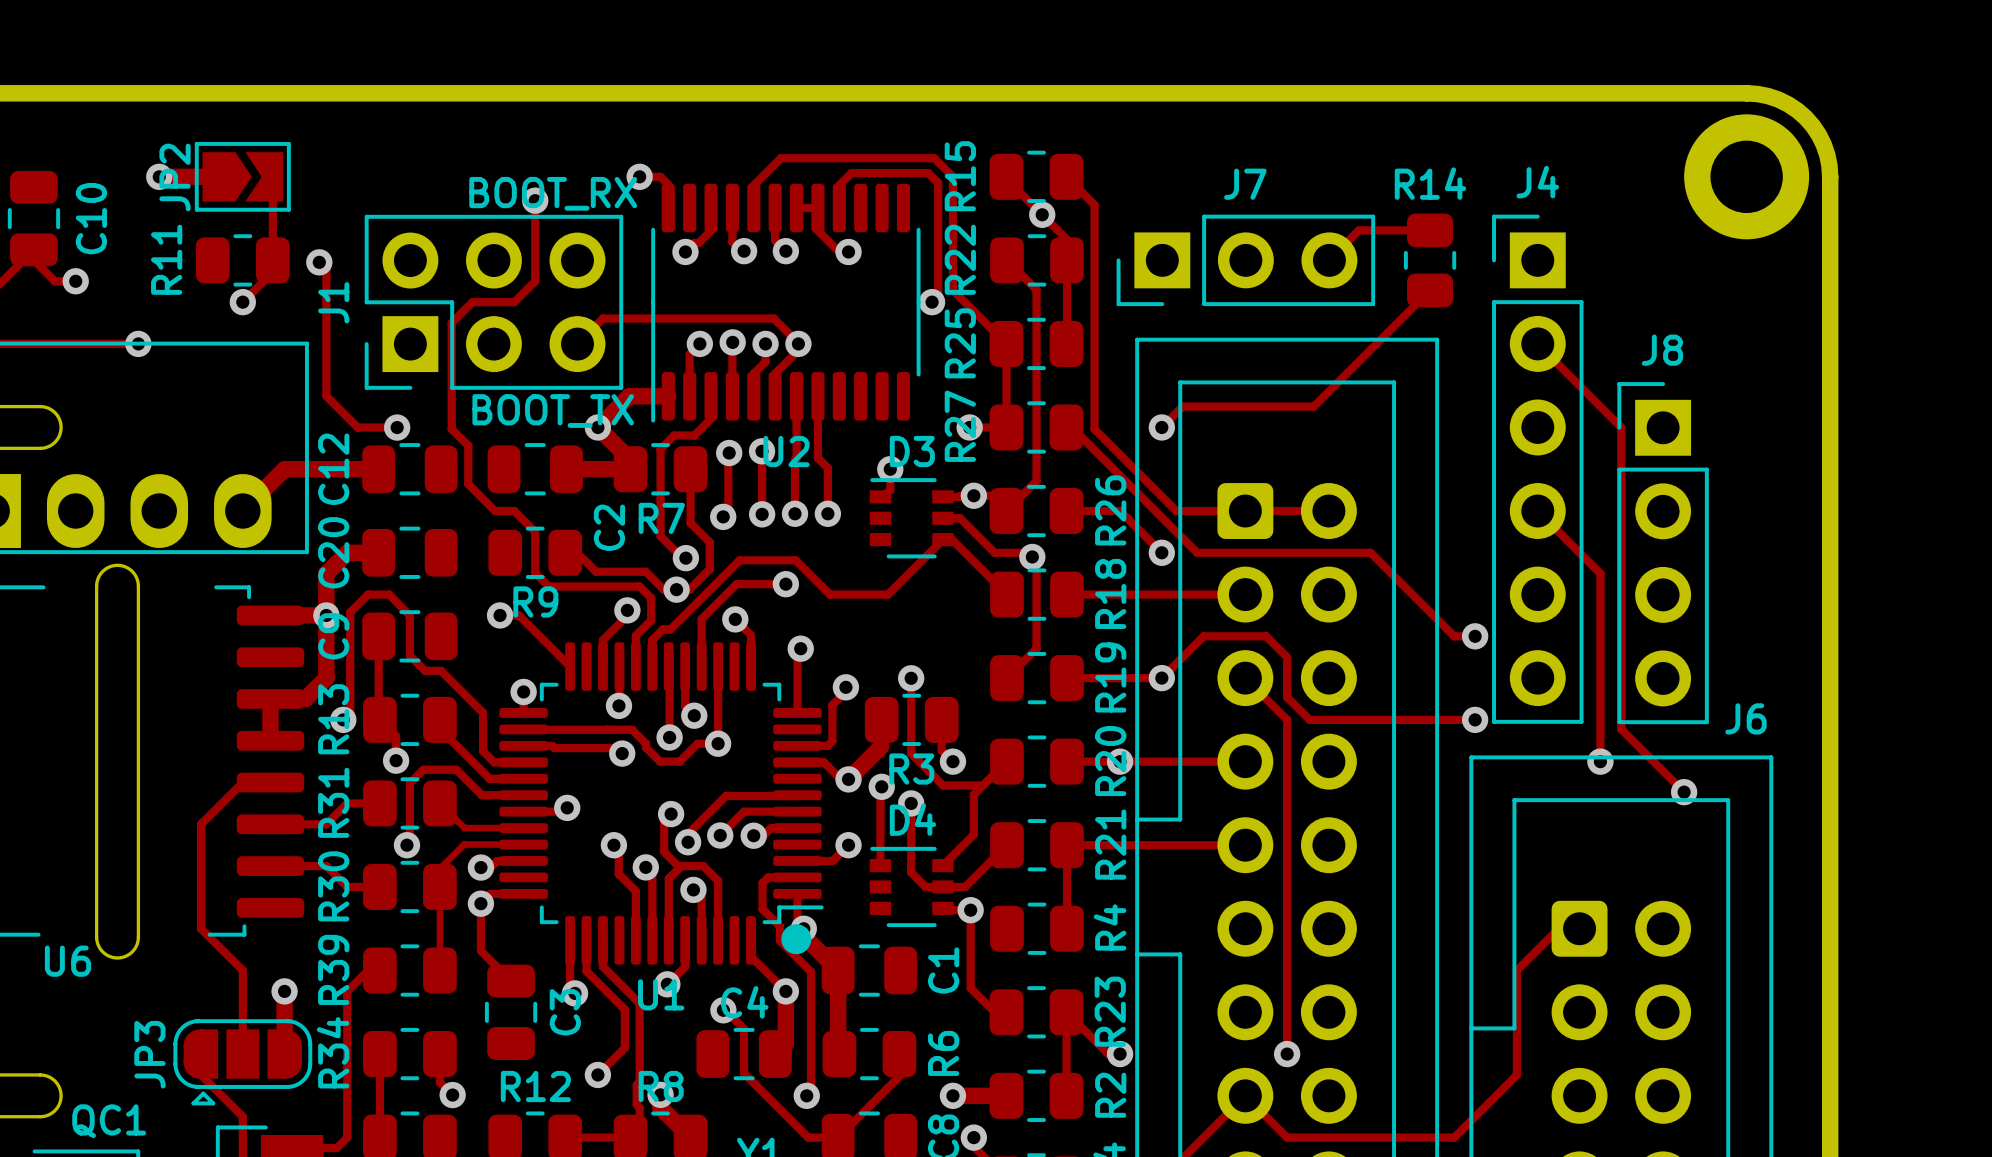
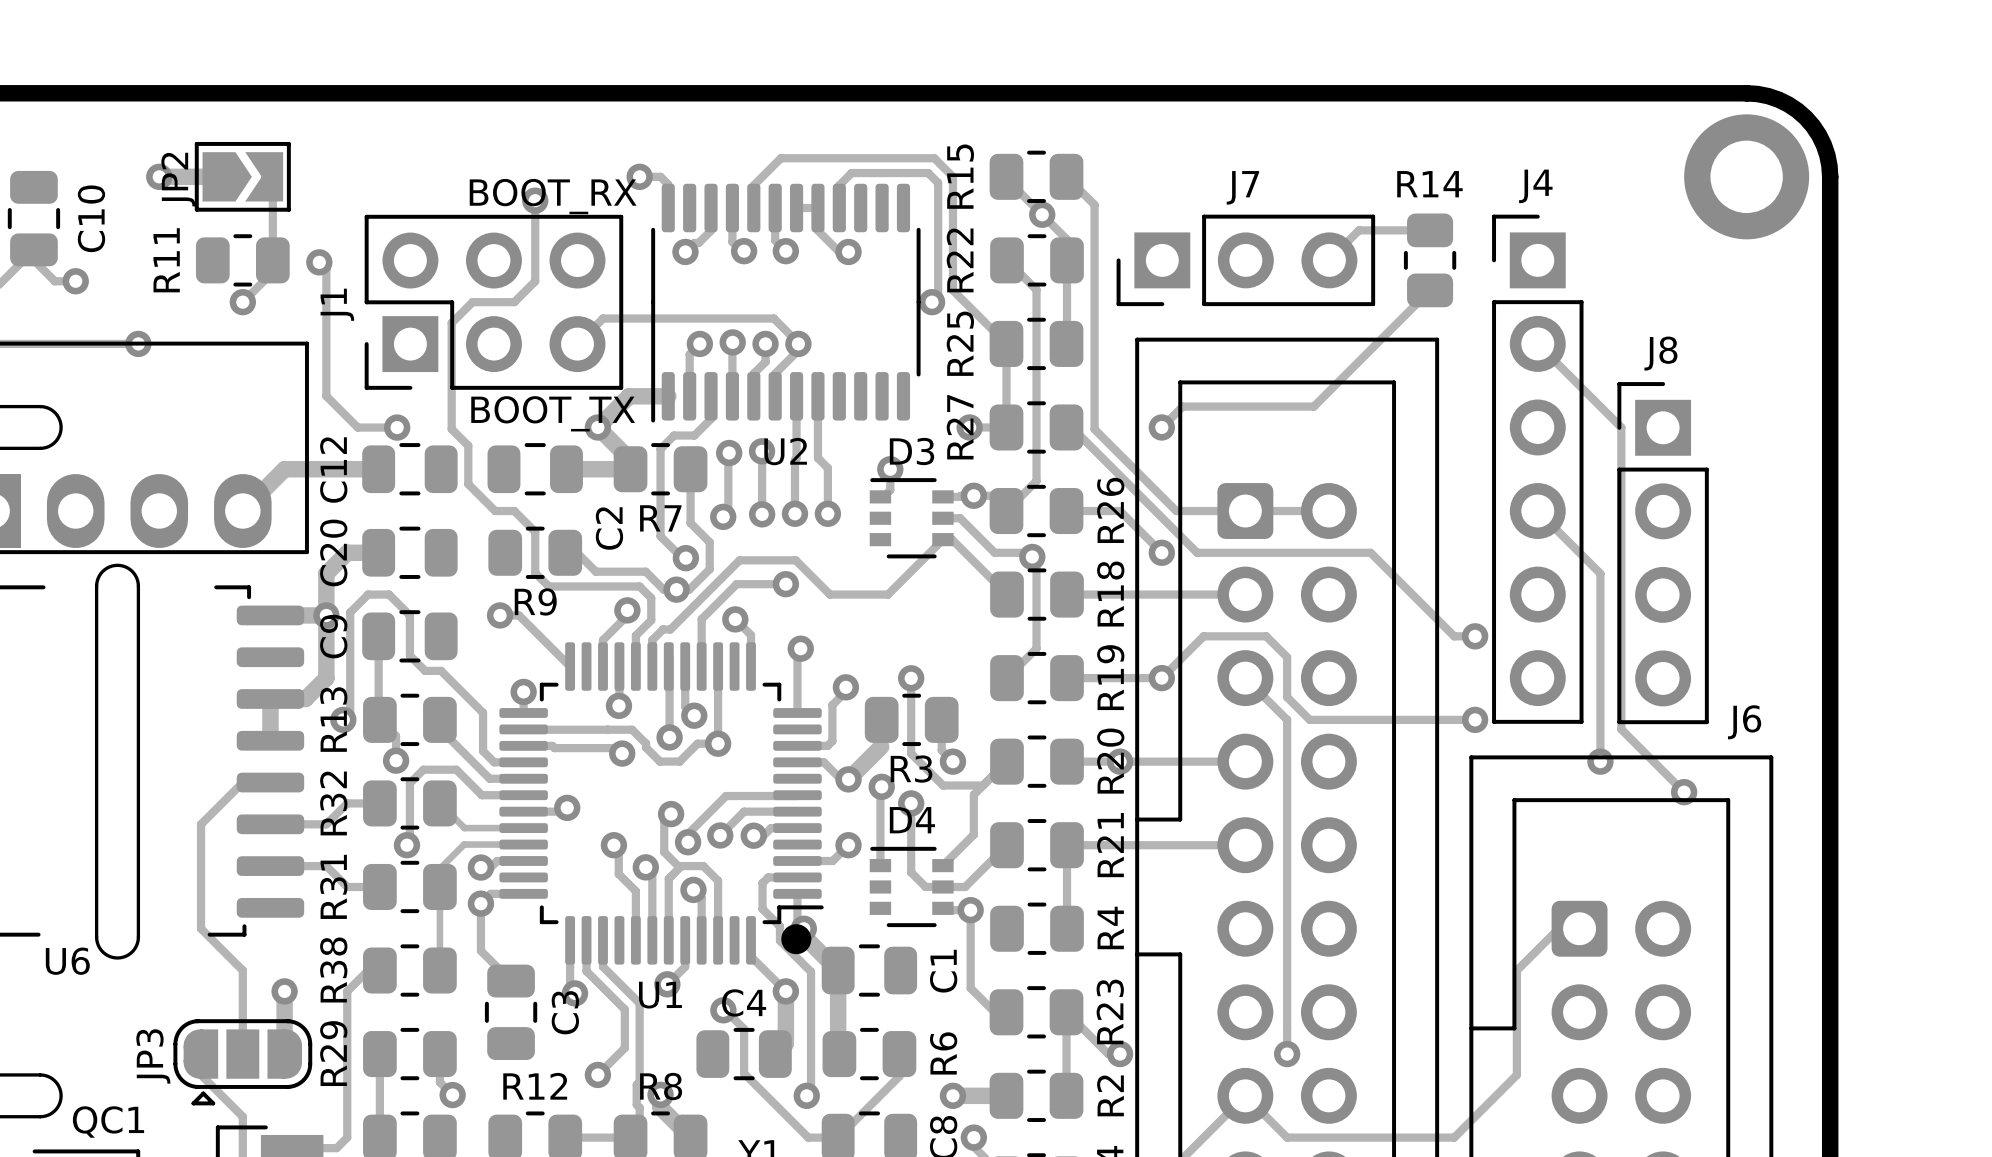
R31 name: R31 (333, 802) -> R32 (333, 803)
R30 name: R30 (333, 886) -> R31 (333, 886)
R39 name: R39 (333, 969) -> R38 (333, 969)
R34 name: R34 (333, 1052) -> R29 (333, 1053)

